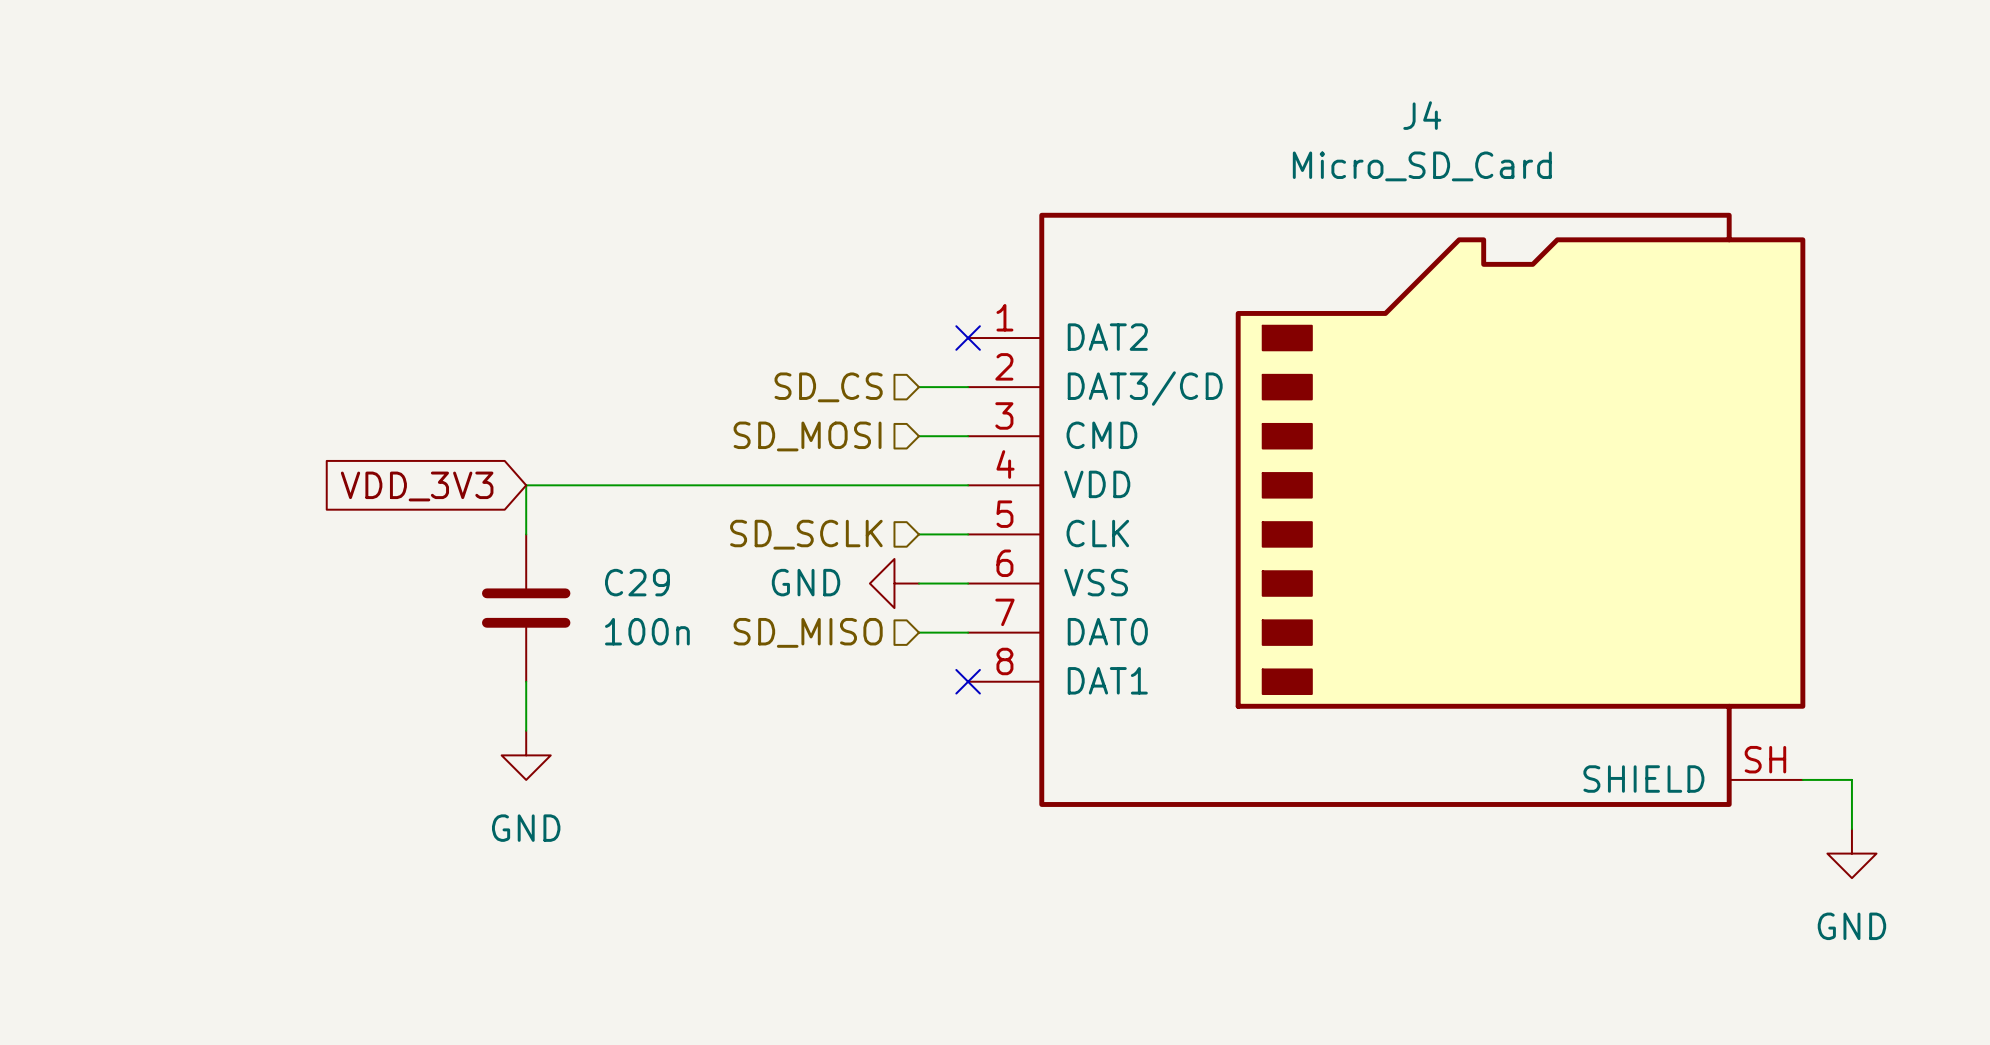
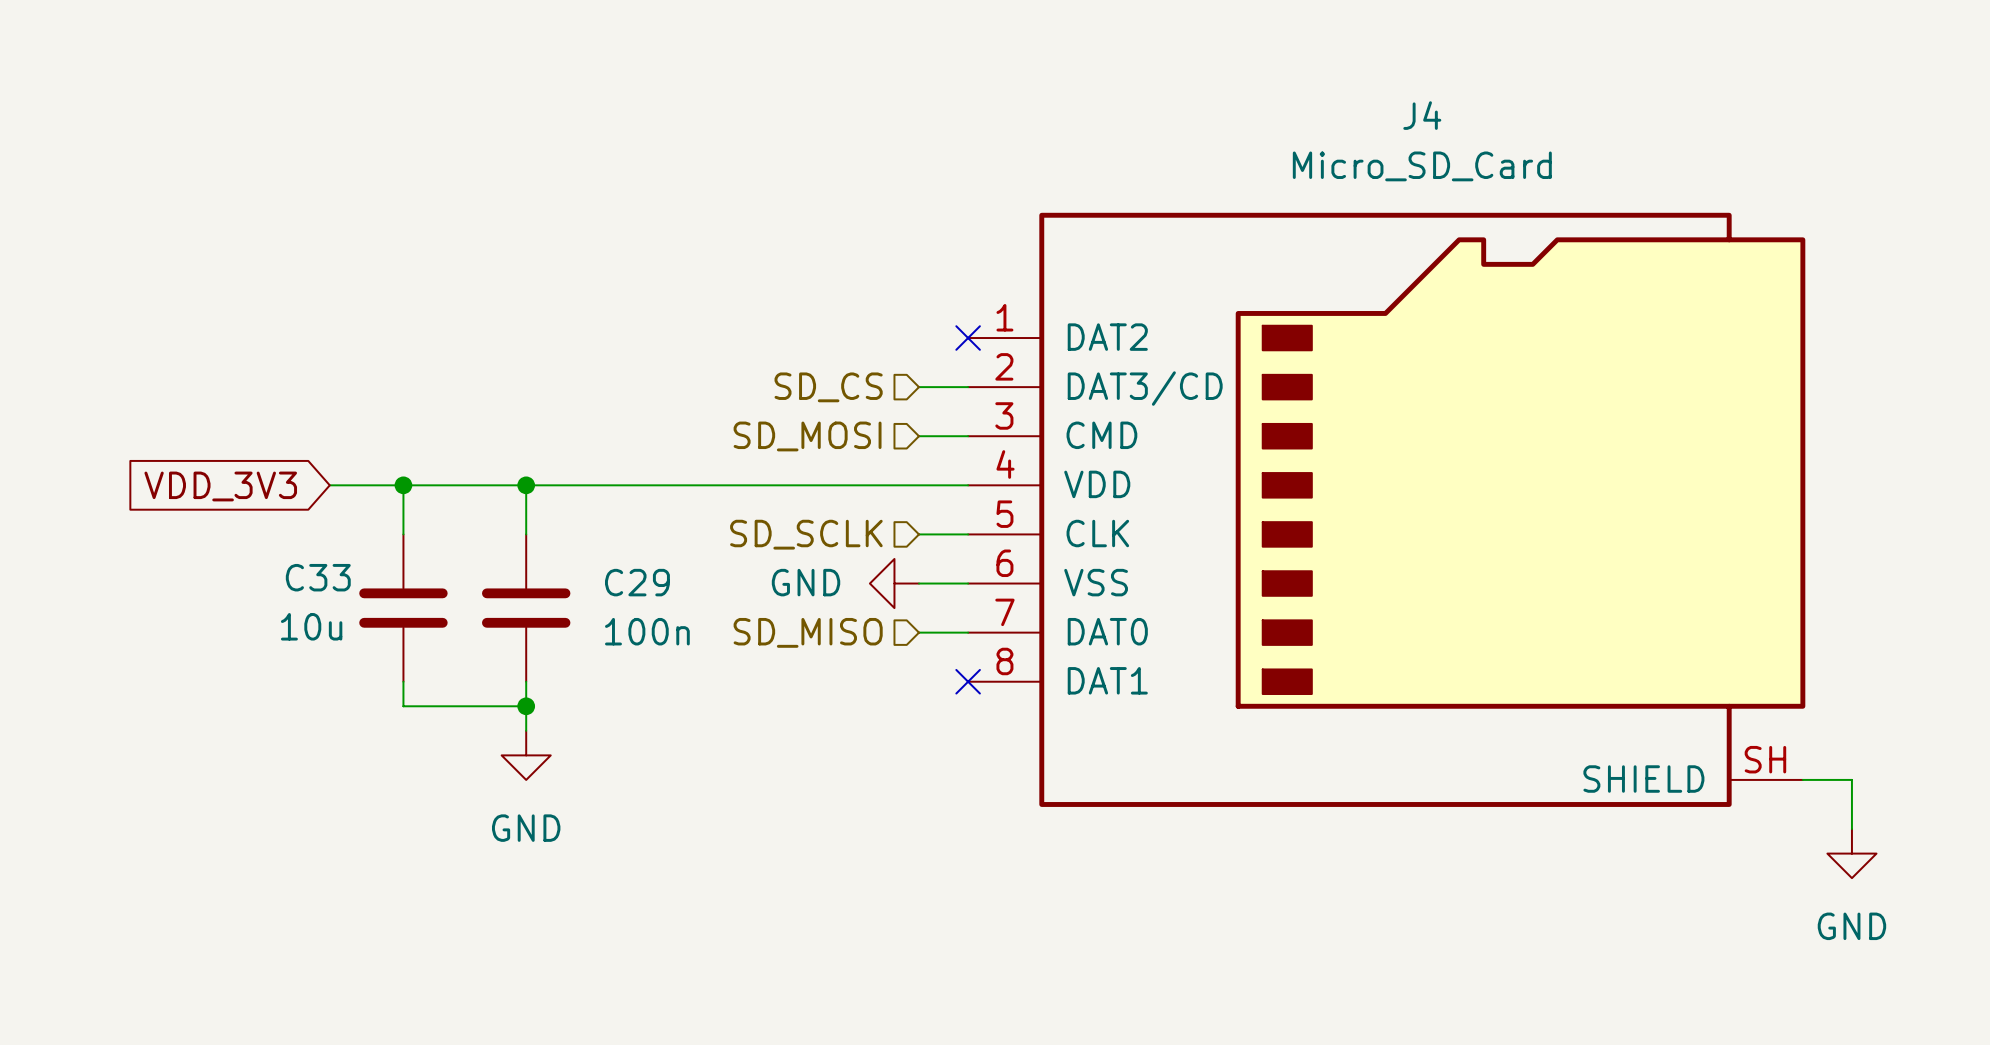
wire: none -> (329, 485) (526, 485)
wire: none -> (403, 485) (403, 534)
junction: none -> (403, 485)
junction: none -> (526, 485)
global label position: VDD_3V3 (417, 486) -> VDD_3V3 (220, 486)
C33: none -> 10u (403, 608)
wire: none -> (403, 681) (403, 706) (526, 706)
junction: none -> (526, 706)

